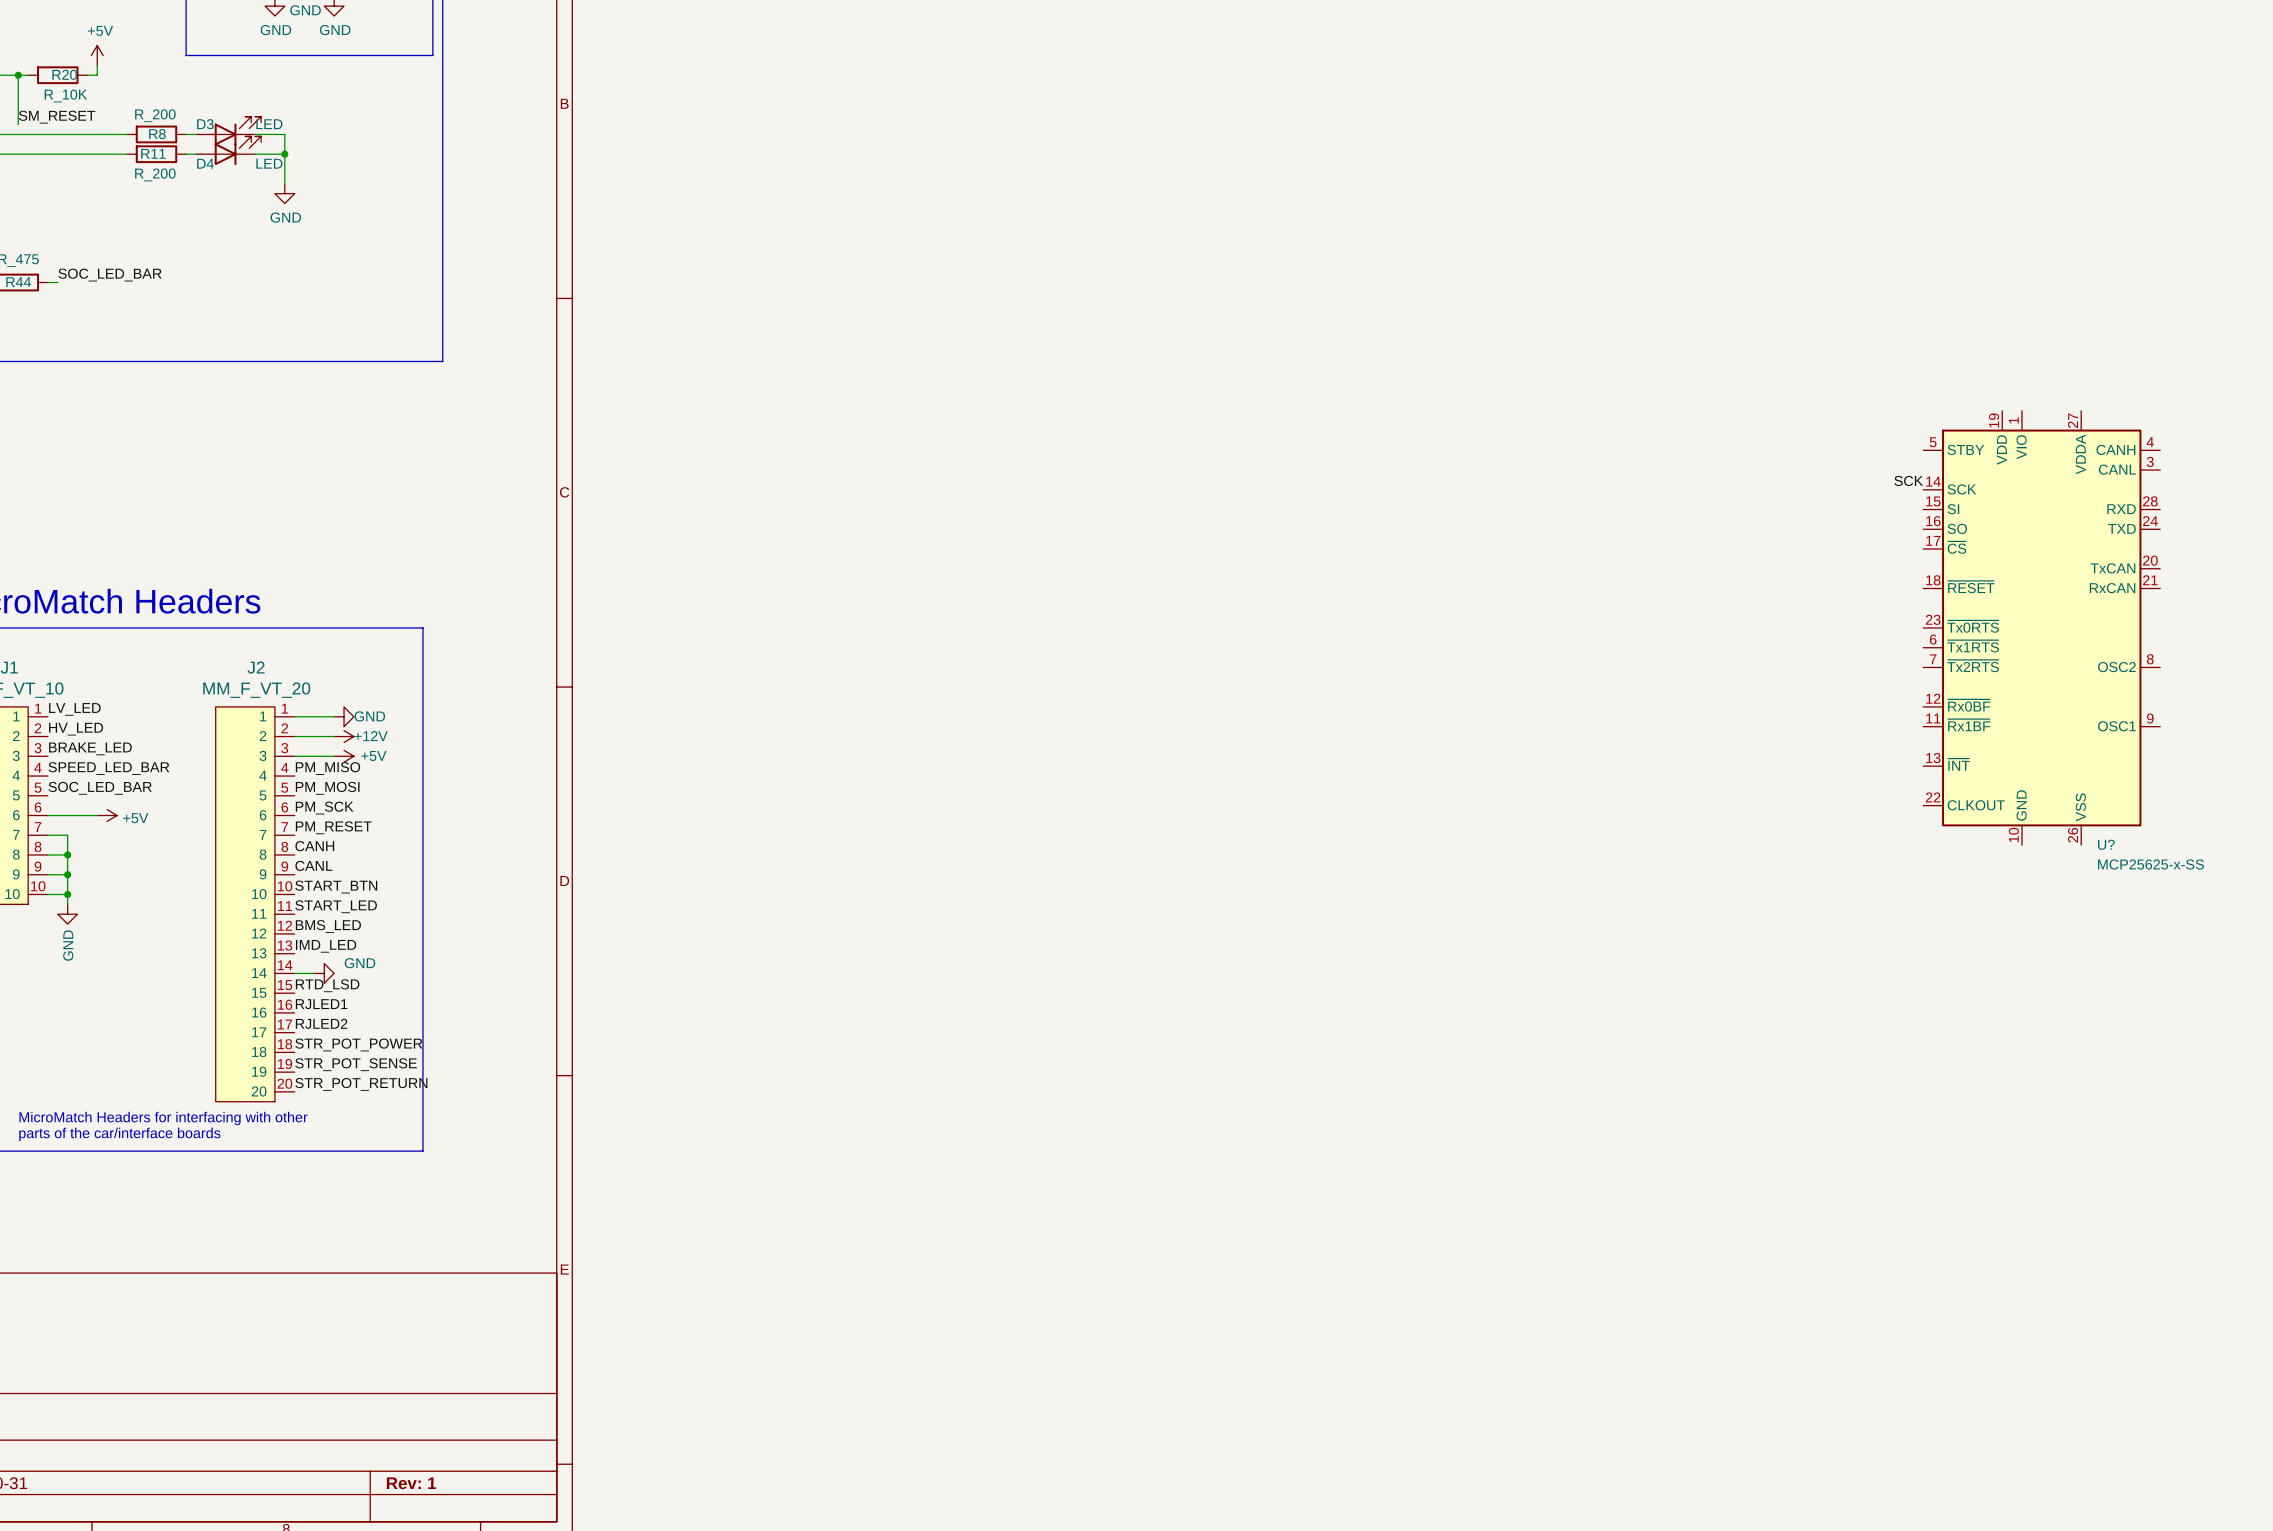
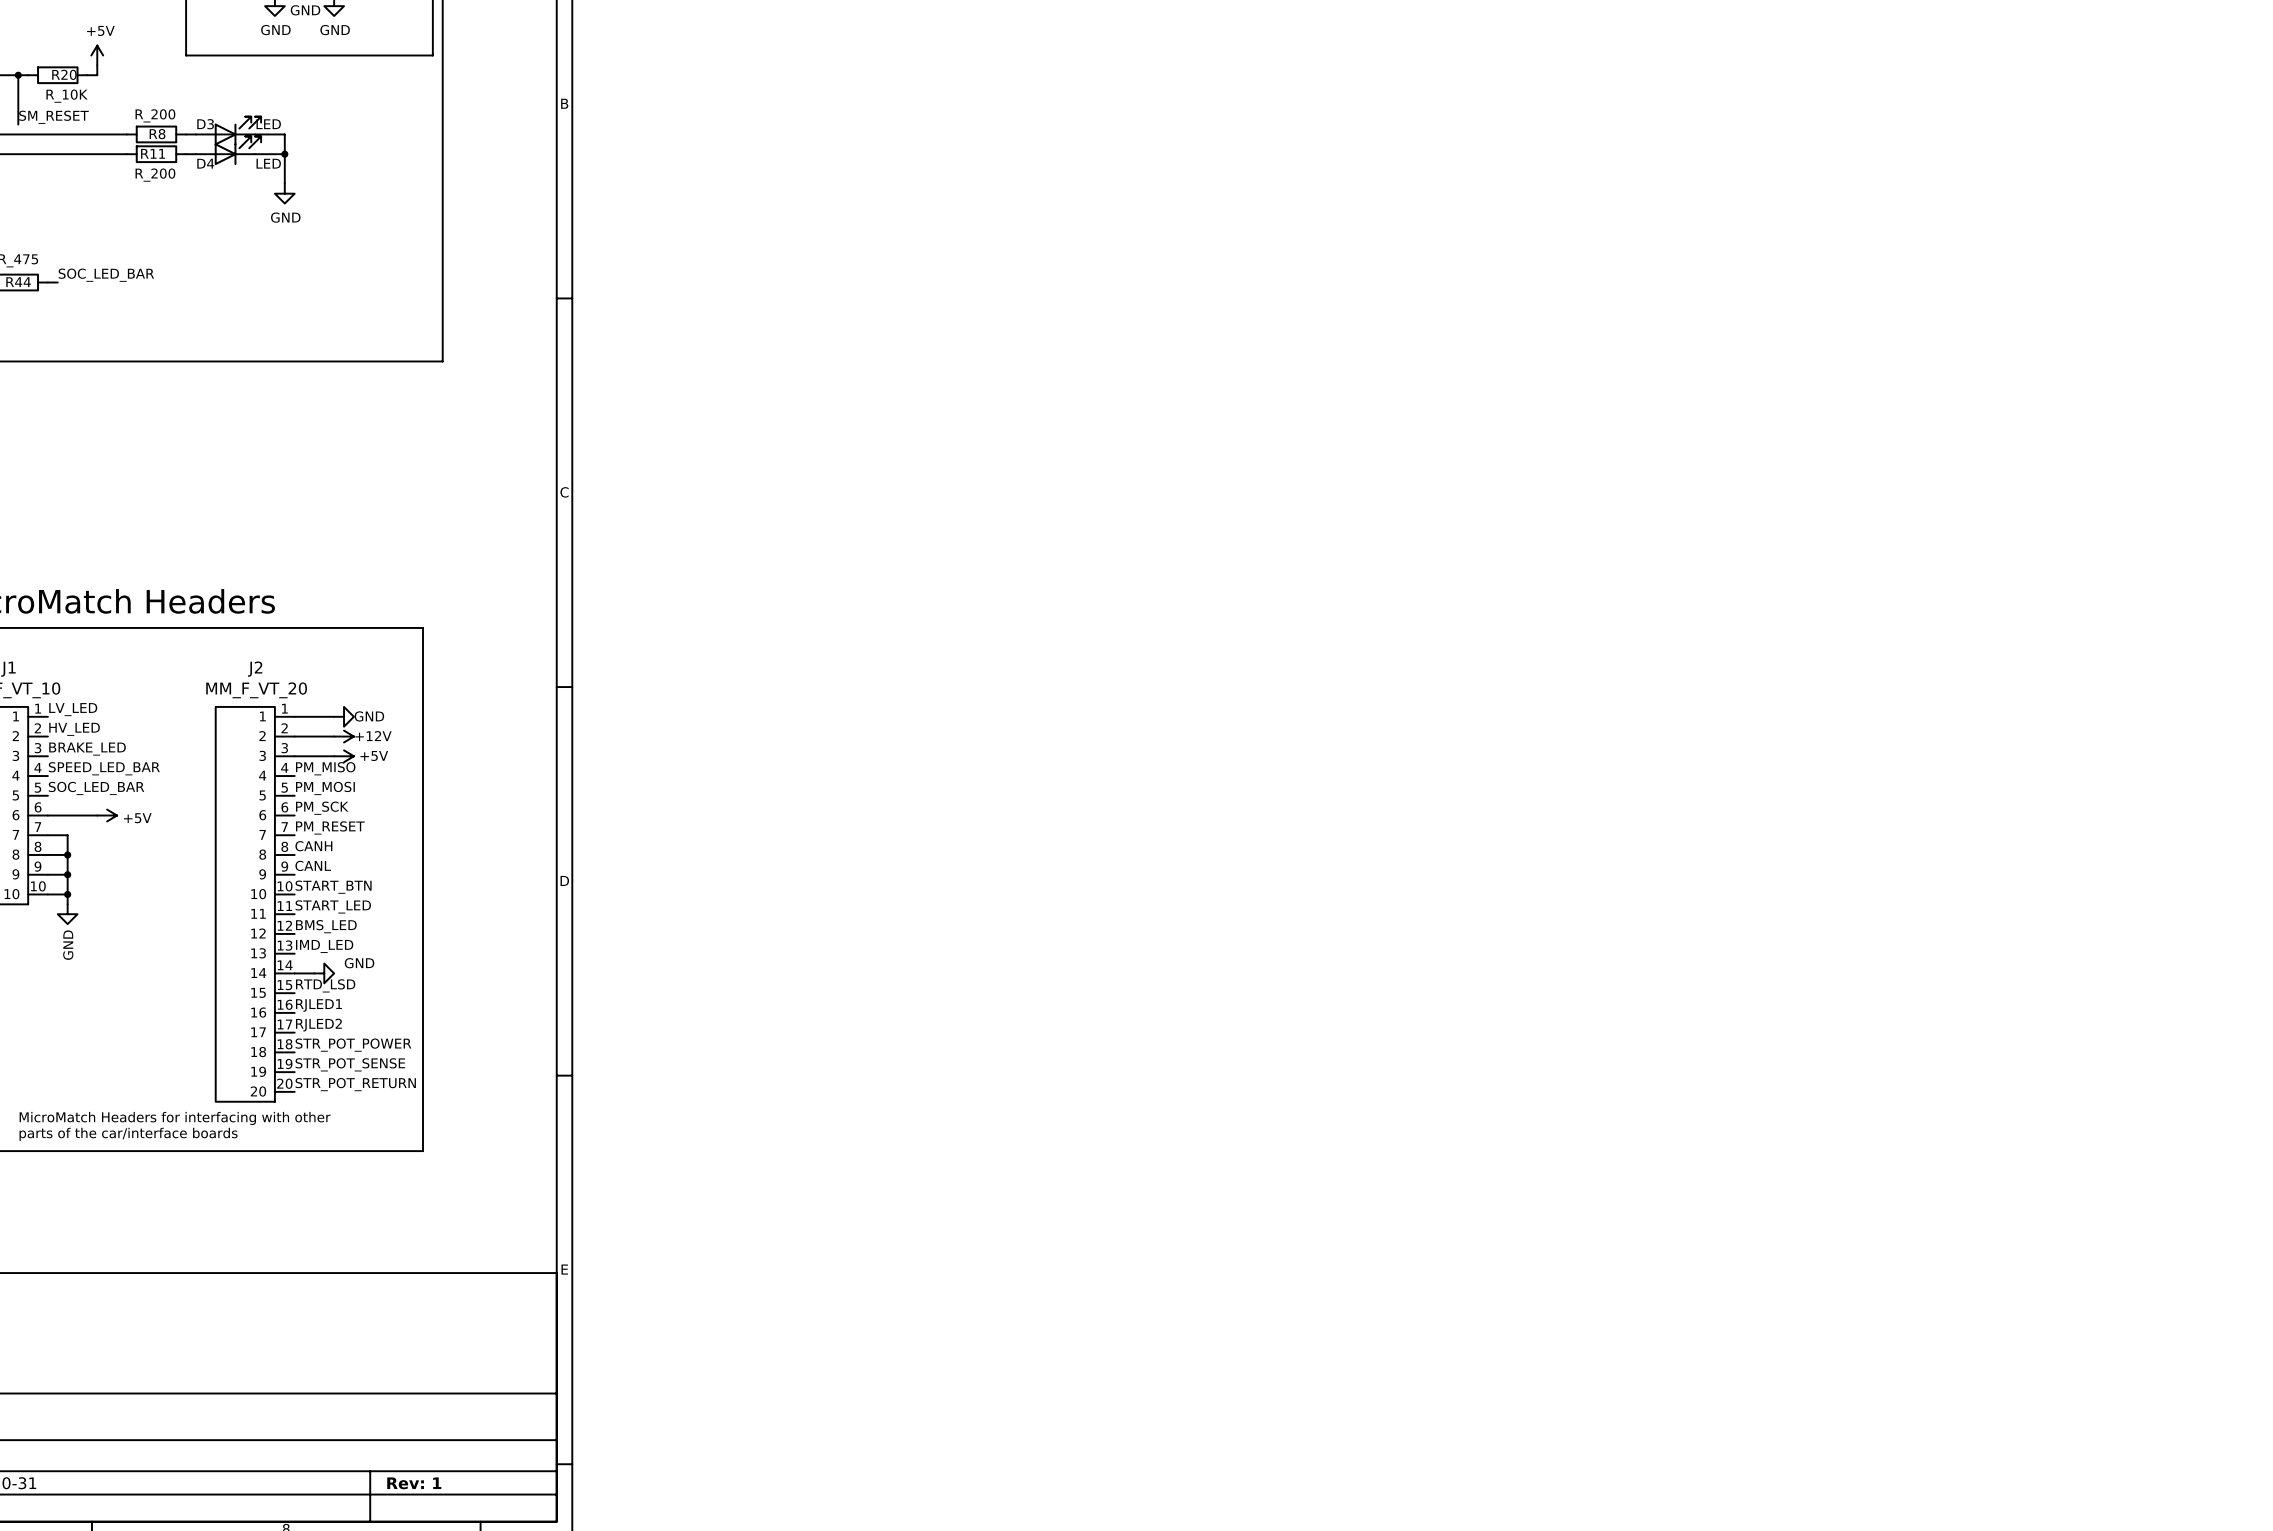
label: SCK (1908, 480) -> none
U?: MCP25625-x-SS (2041, 627) -> none

